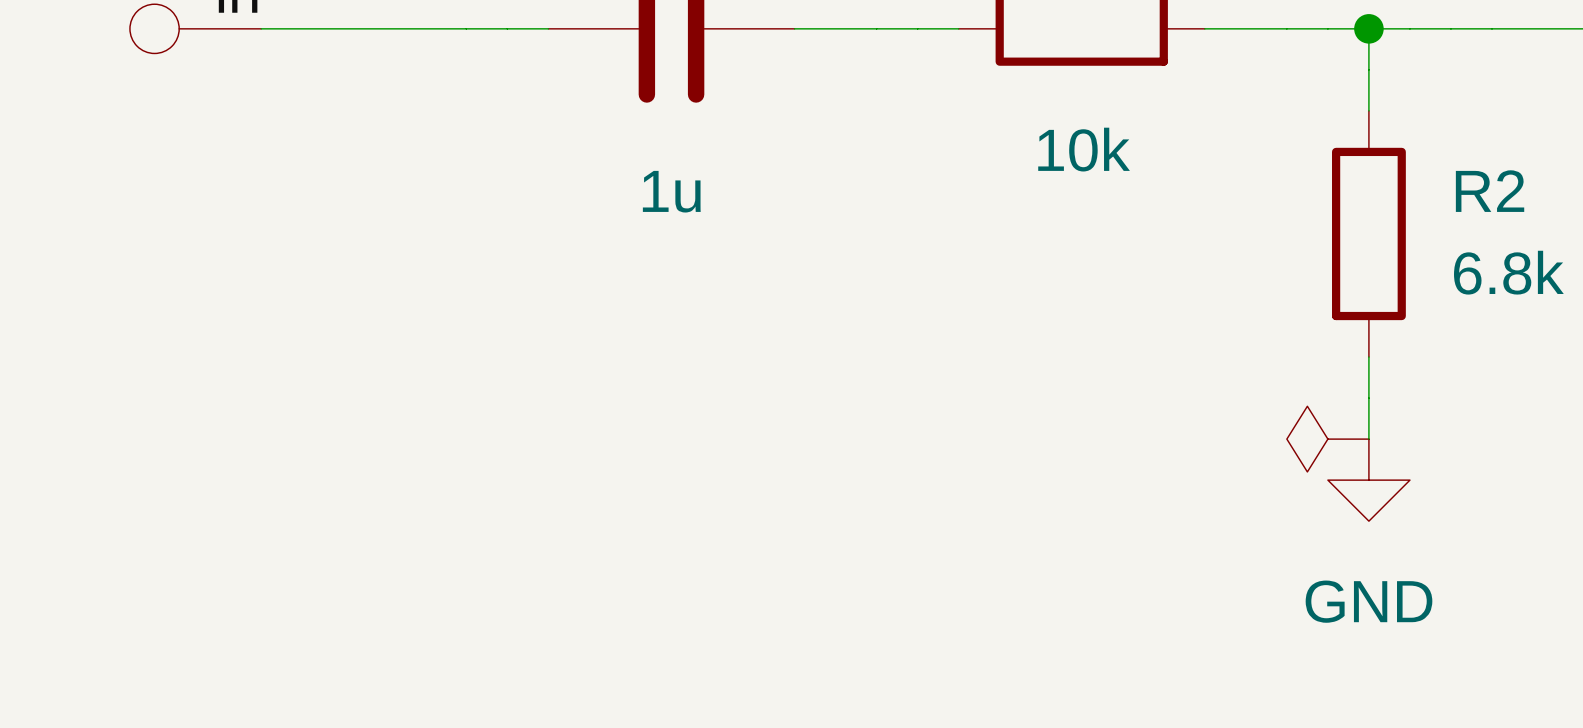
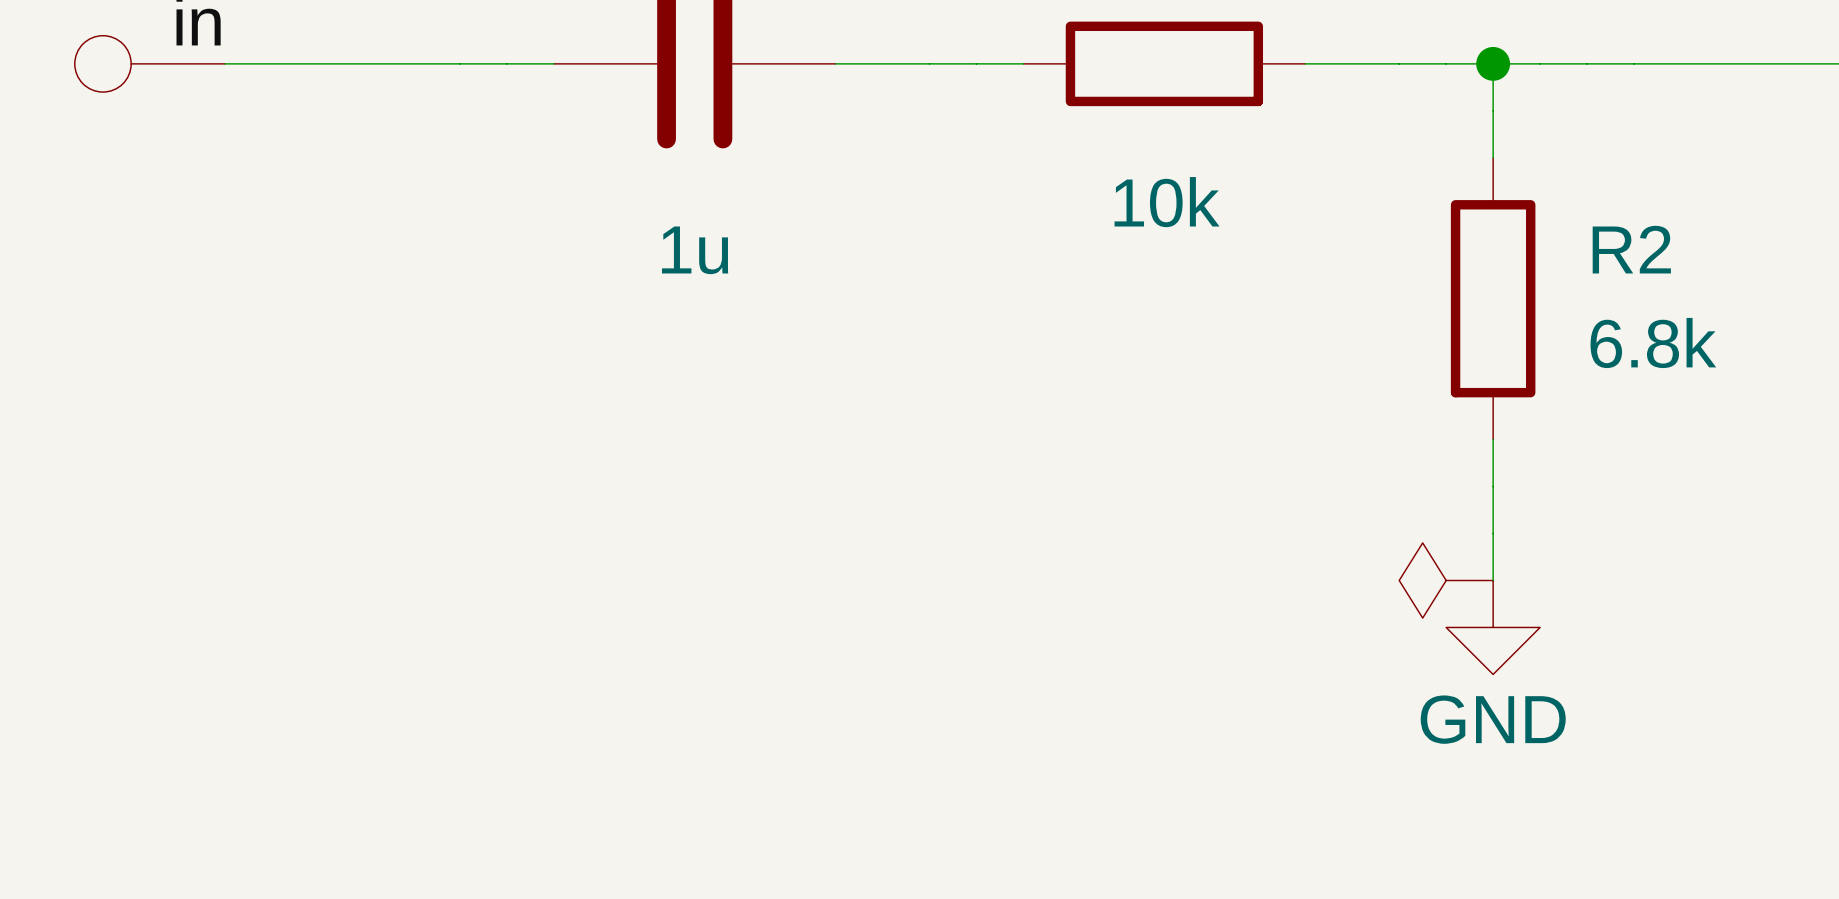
power symbol position: (1327, 439) -> (1446, 580)
power symbol position: GND (1368, 480) -> GND (1493, 627)

